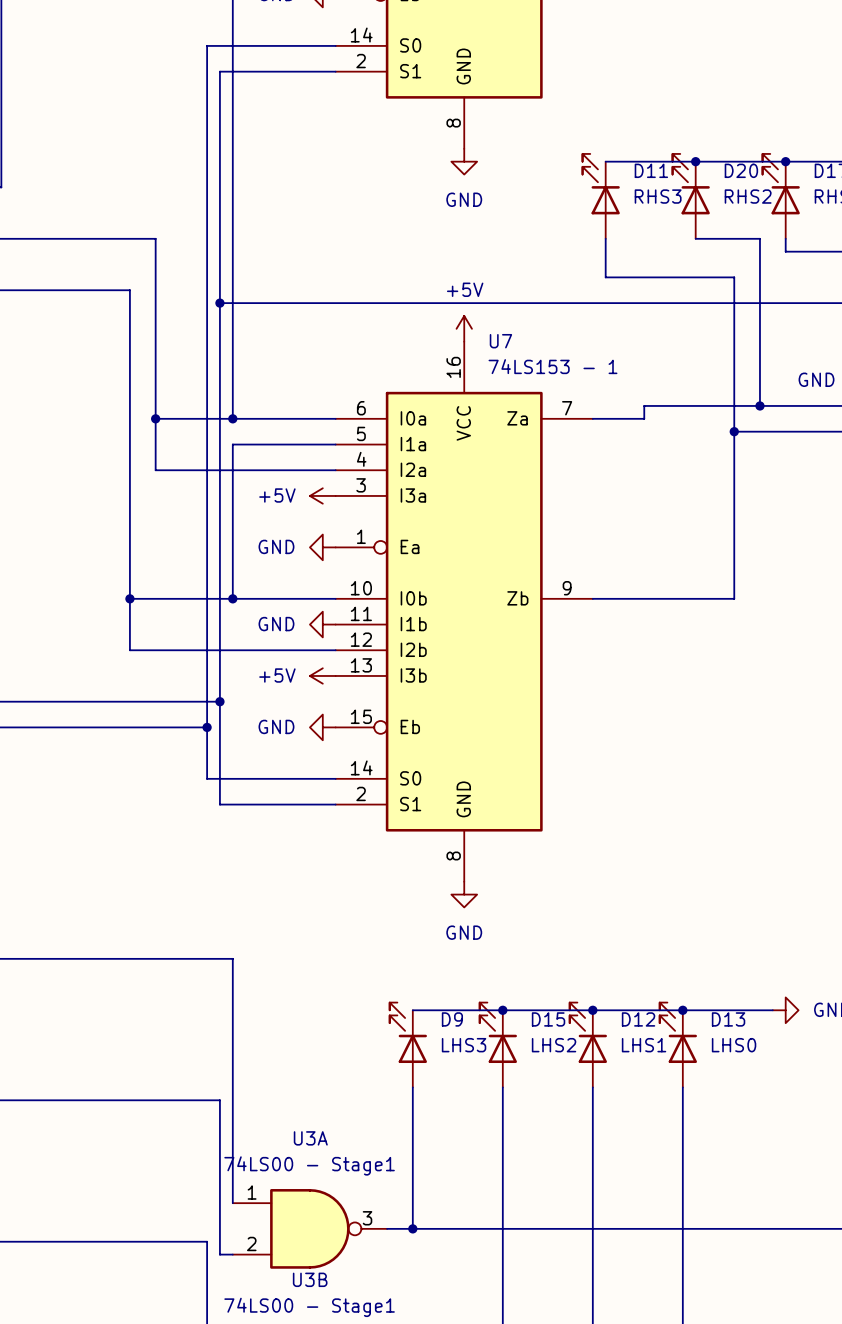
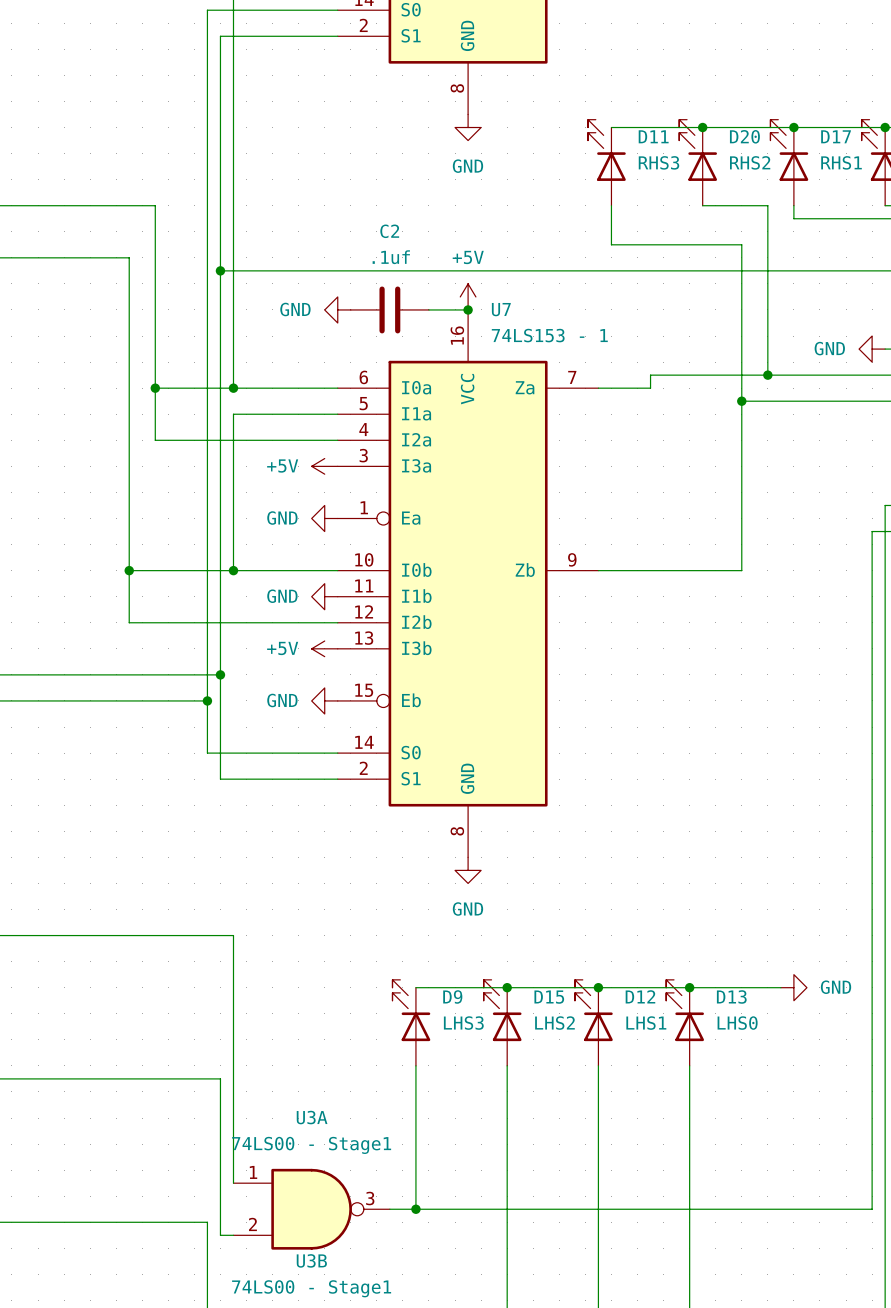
power symbol: none -> GND (337, 309)
C2: none -> .1uf (389, 309)
wire: none -> (428, 309) (468, 309)
junction: none -> (468, 309)

